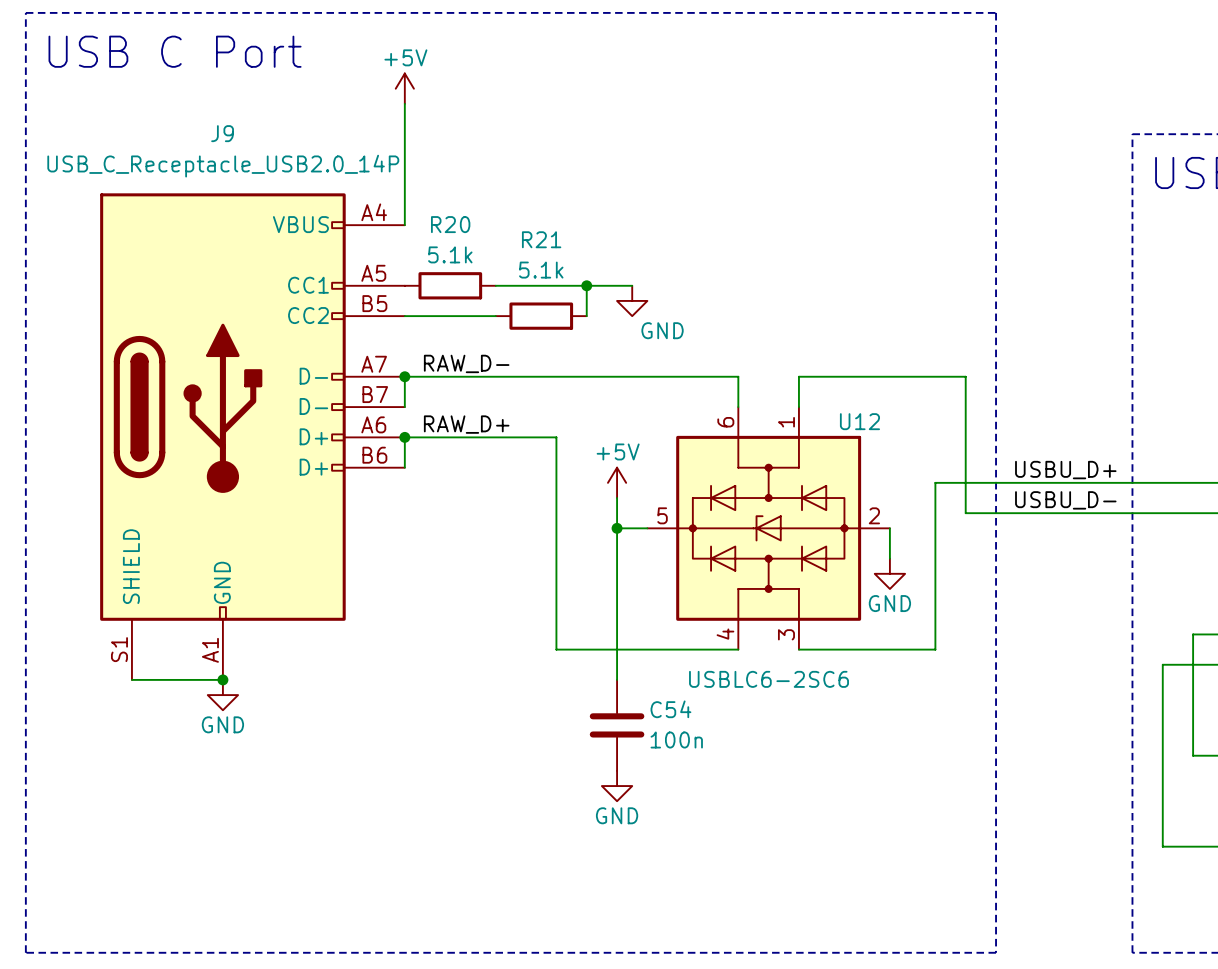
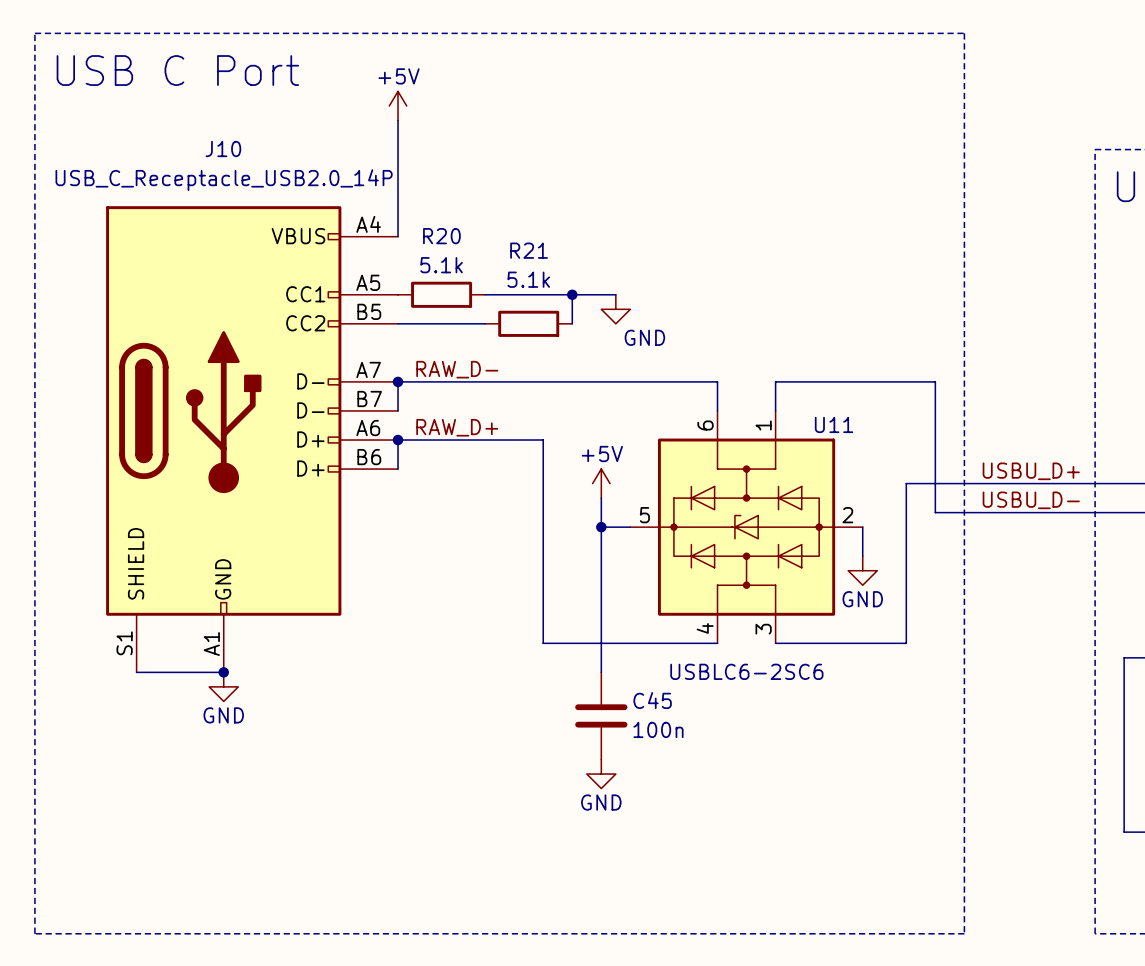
J9 name: J9 (222, 133) -> J10 (223, 149)
U12 name: U12 (859, 421) -> U11 (834, 424)
C54 name: C54 (670, 709) -> C45 (652, 700)

